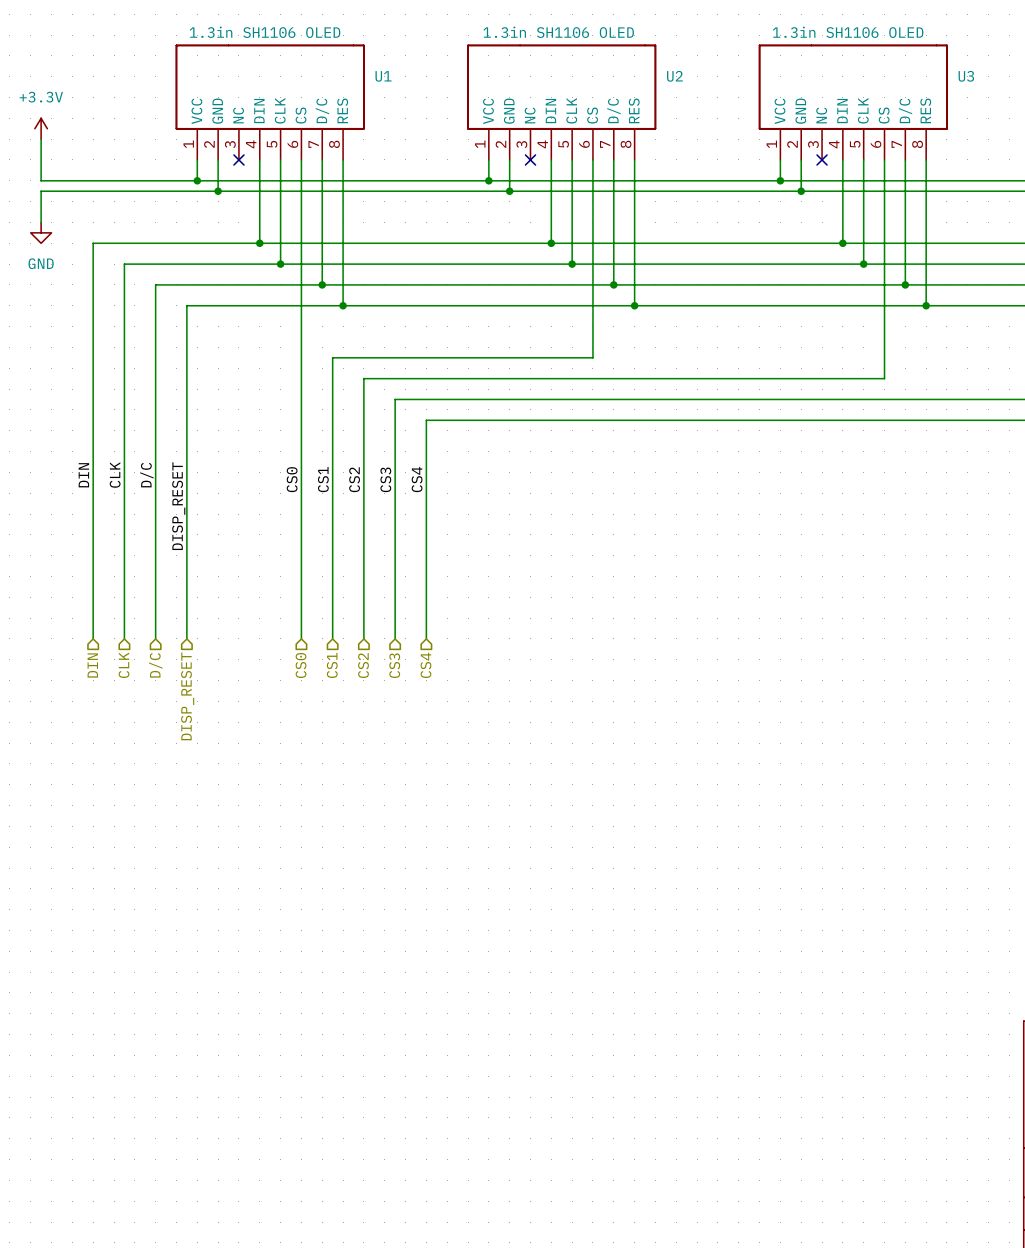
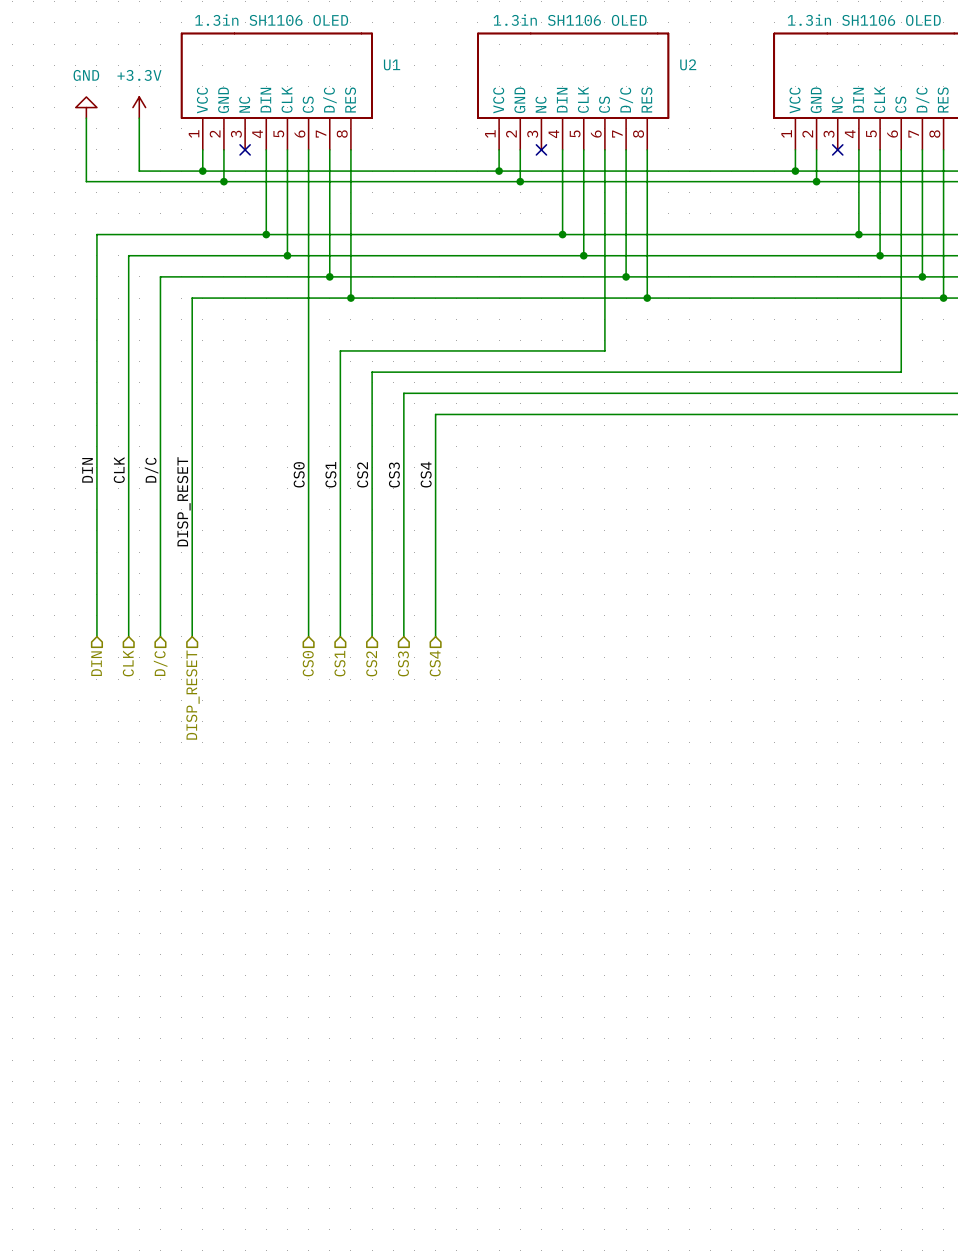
power symbol position: +3.3V (41, 128) -> +3.3V (139, 107)
wire: (41, 139) (41, 180) (134, 180) -> (139, 118) (139, 171)
wire: (82, 191) (41, 191) (41, 222) -> (86, 181) (86, 118)
power symbol rotation: 0° (41, 232) -> 180° (86, 107)
power symbol position: GND (41, 232) -> GND (86, 107)

